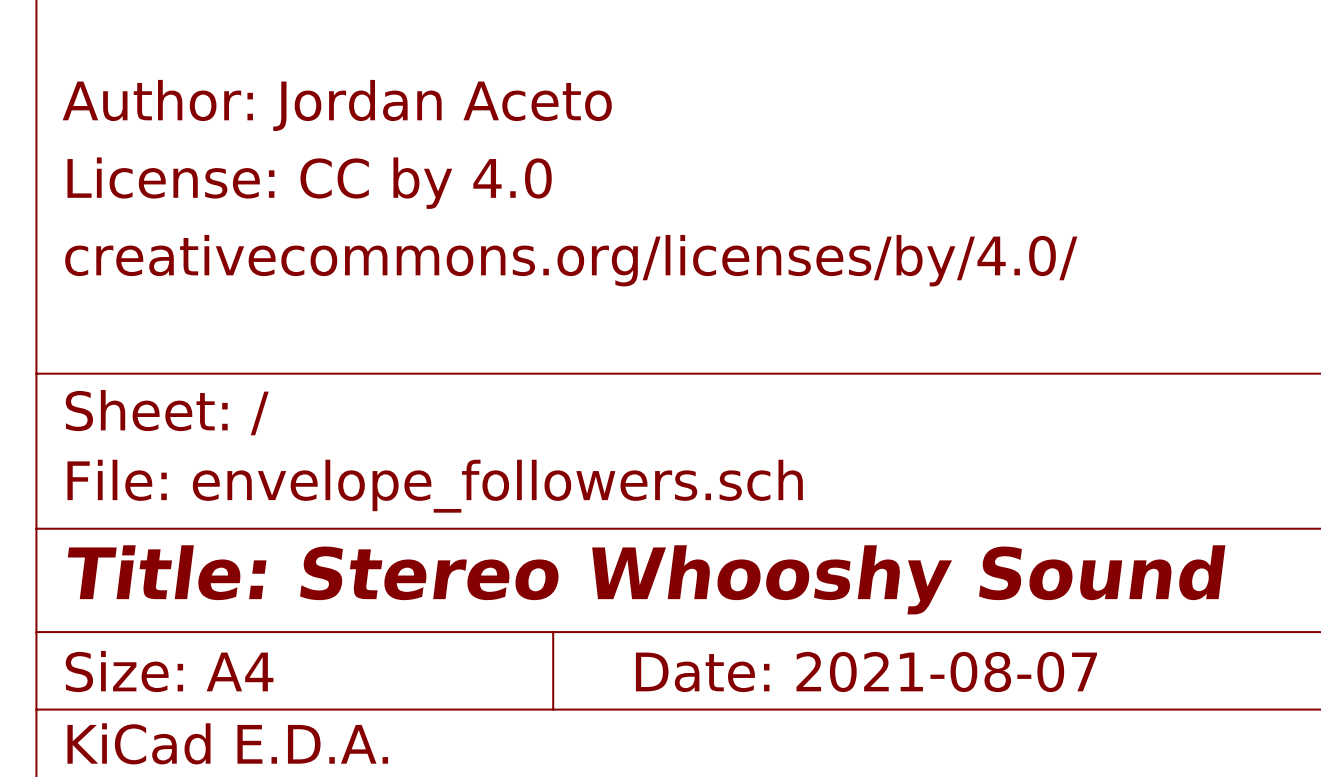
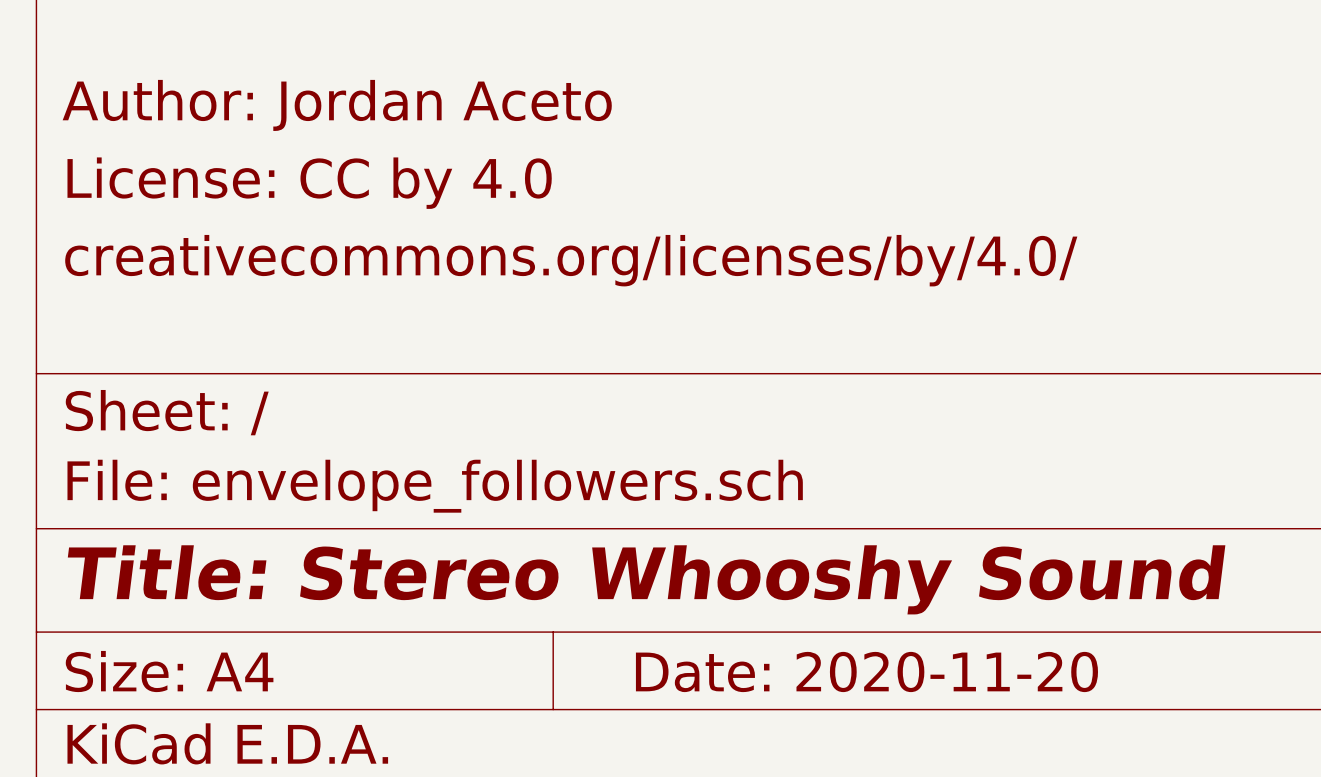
title block: Date: 2021-08-07 (866, 671) -> Date: 2020-11-20 (866, 671)

